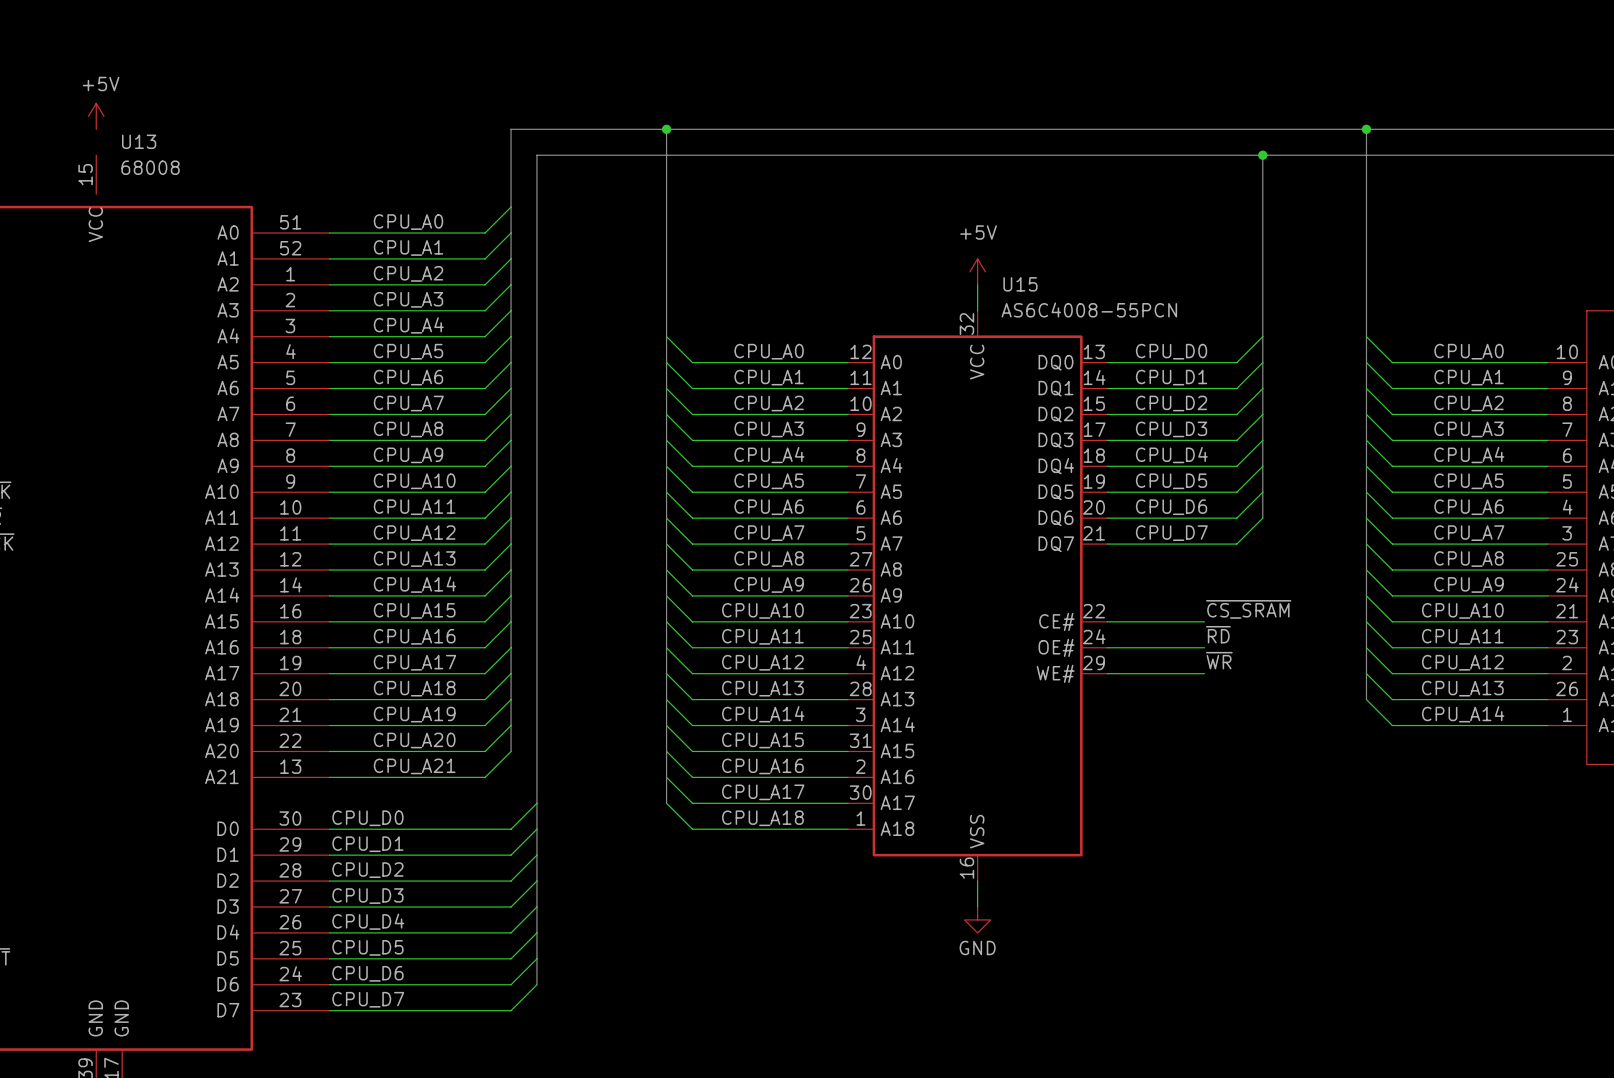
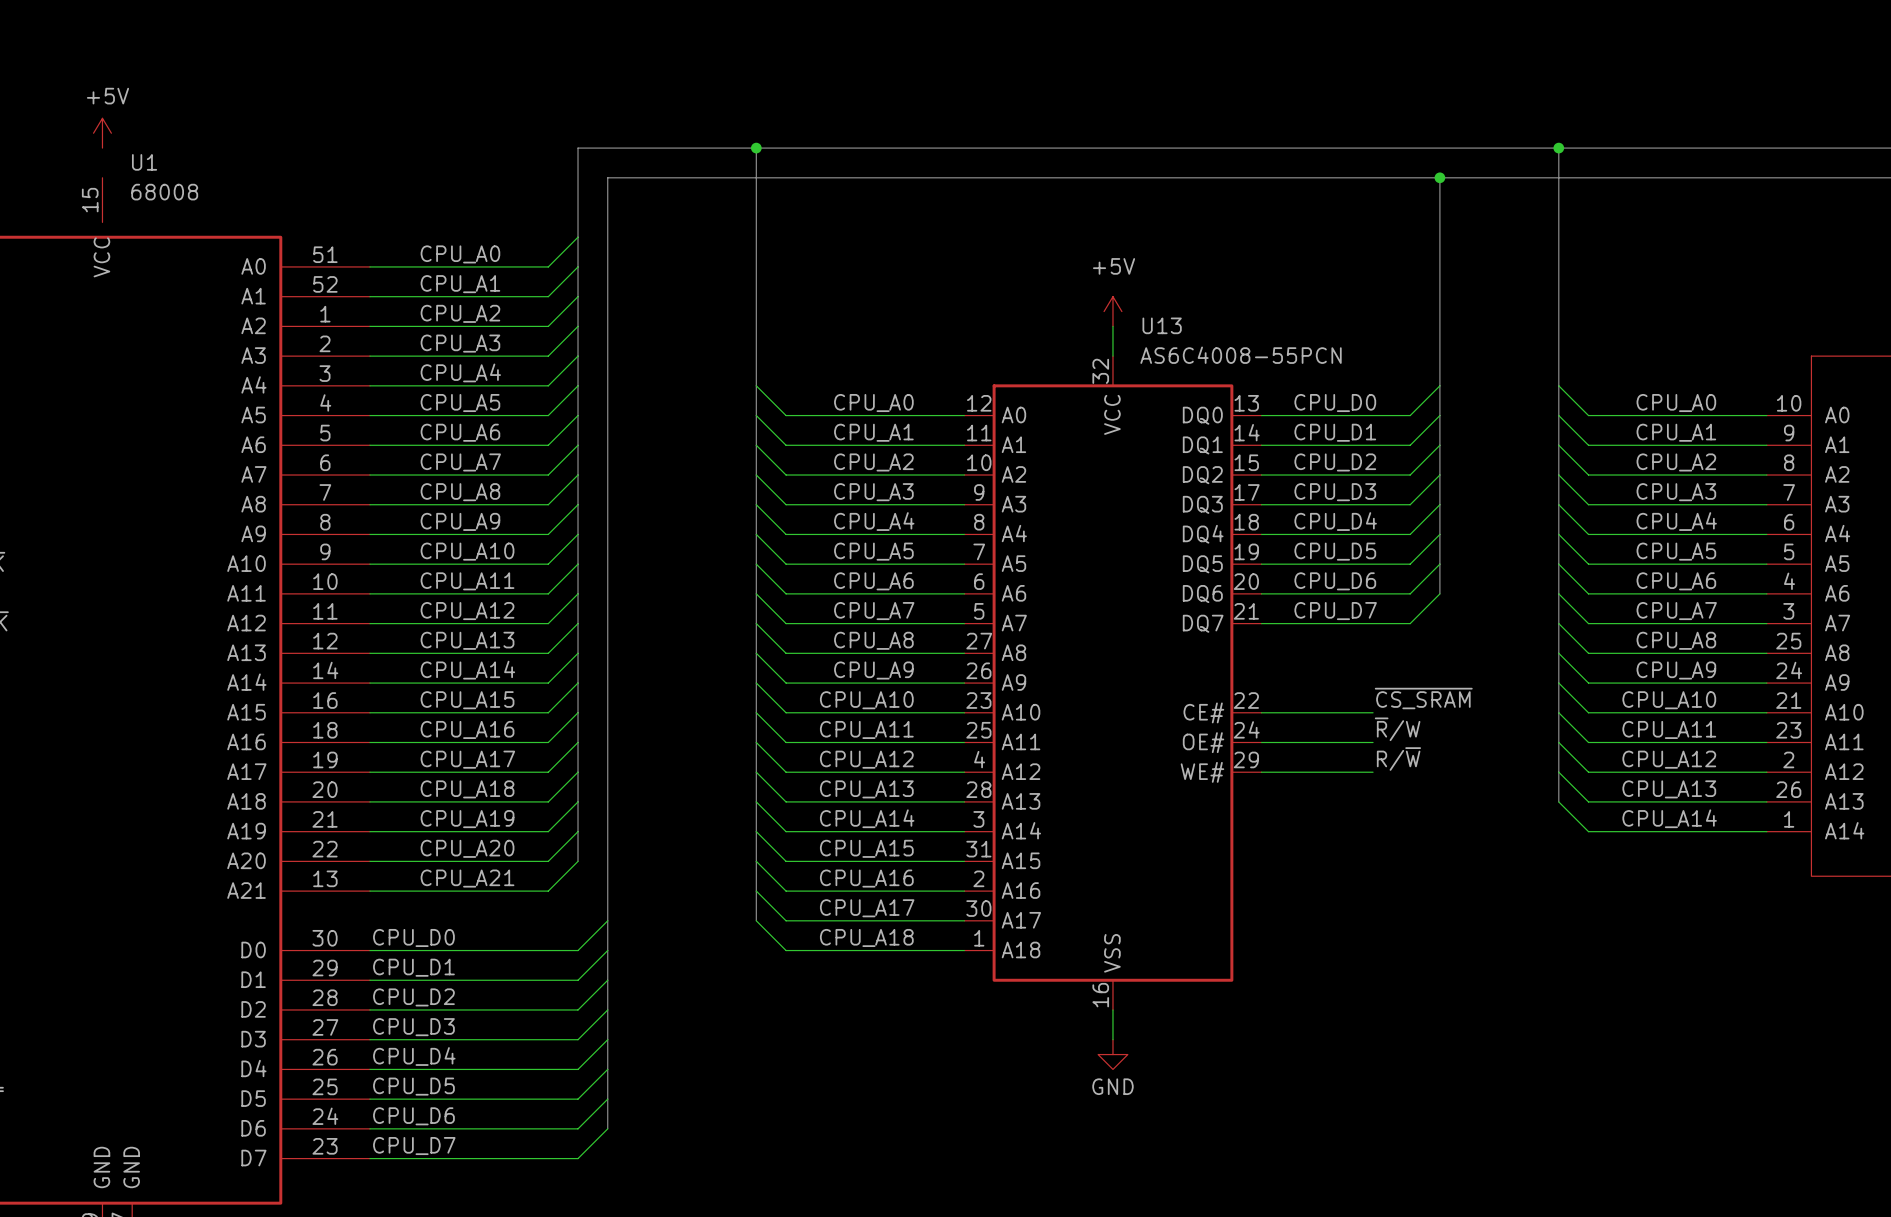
U13 name: U13 (139, 141) -> U1 (144, 162)
U15 name: U15 (1020, 284) -> U13 (1162, 325)
label: ~{RD} (1218, 634) -> ~{R}/W (1397, 729)
label: ~{WR} (1219, 660) -> R/~{W} (1398, 759)

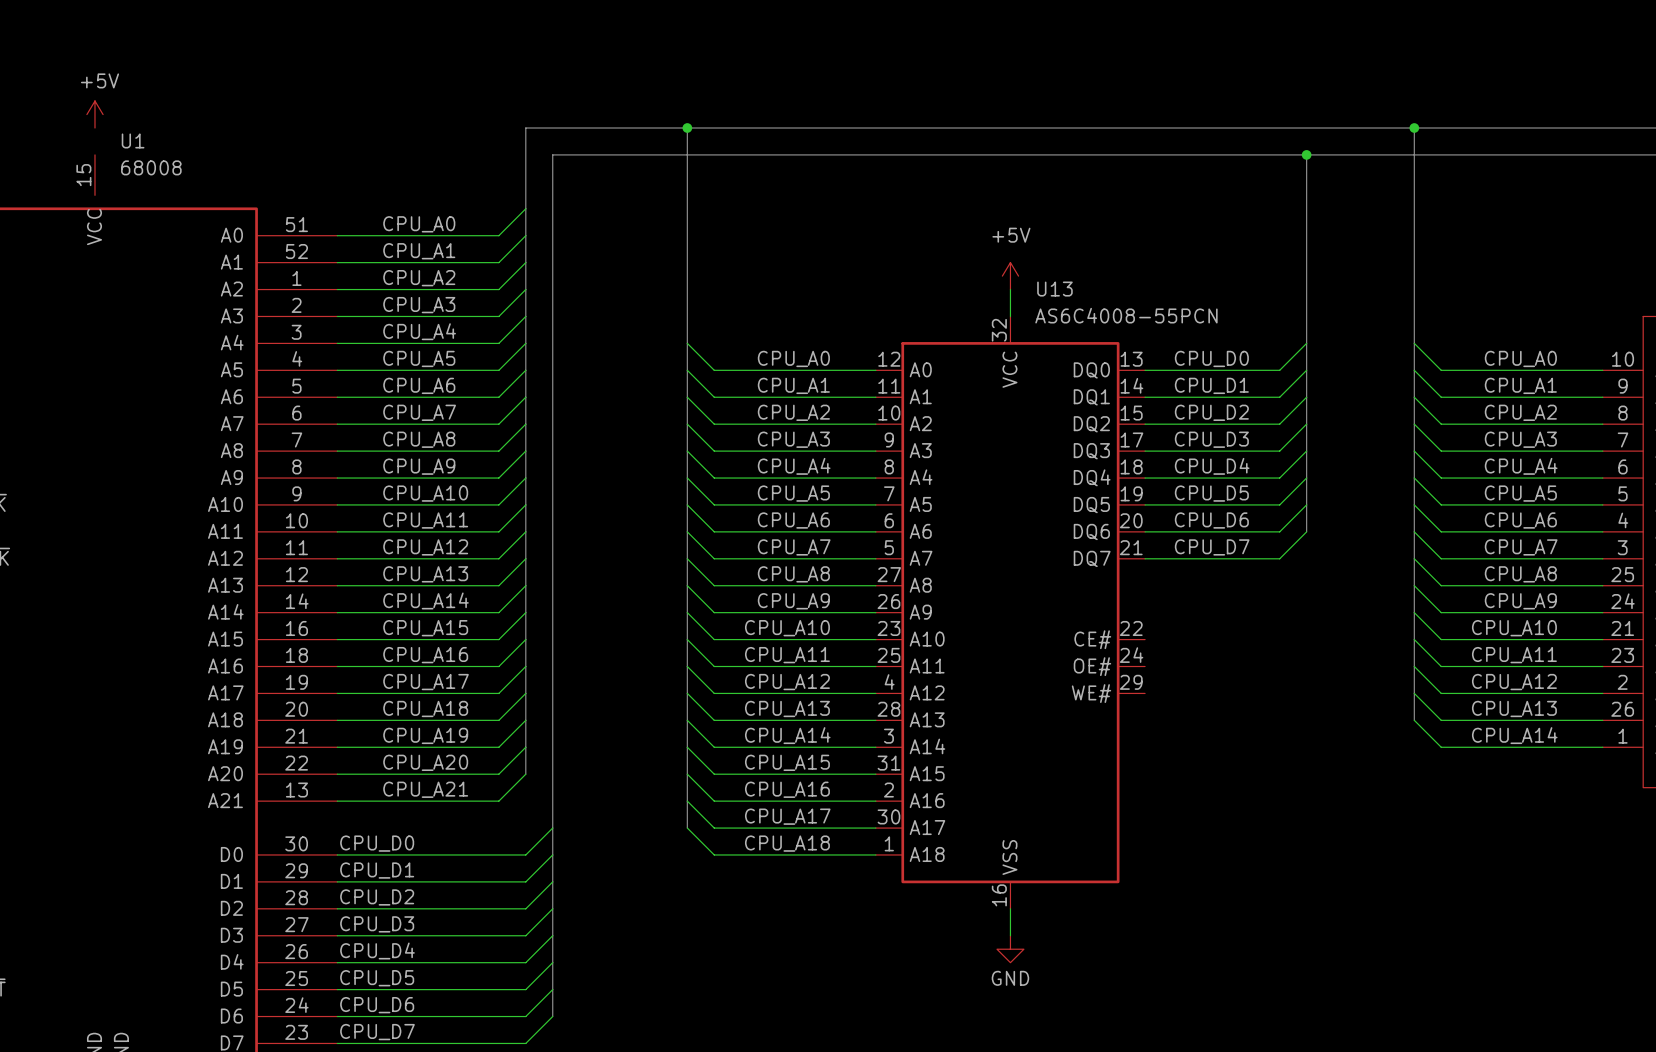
label: ~{CS_SRAM} (1423, 698) -> none
wire: (1261, 712) (1373, 712) -> none
label: ~{R}/W (1397, 729) -> none
wire: (1261, 742) (1373, 742) -> none
label: R/~{W} (1398, 759) -> none
wire: (1261, 772) (1373, 772) -> none

